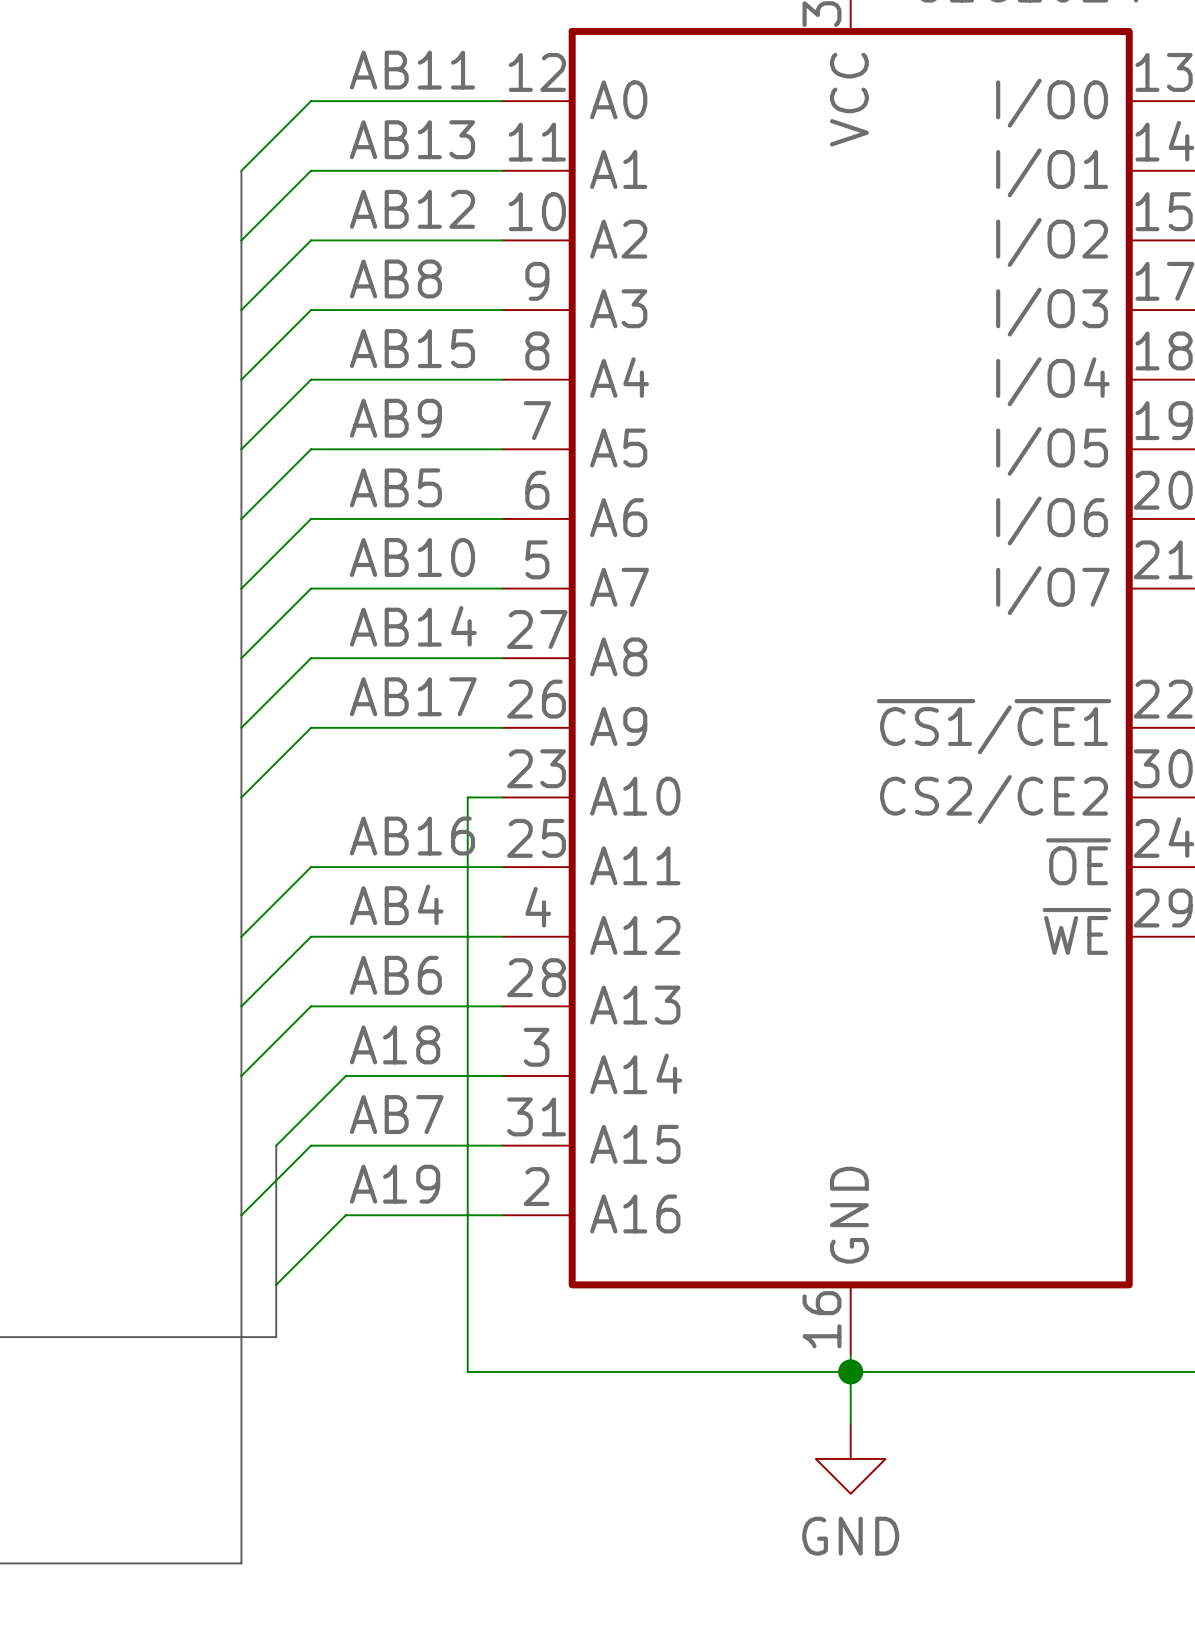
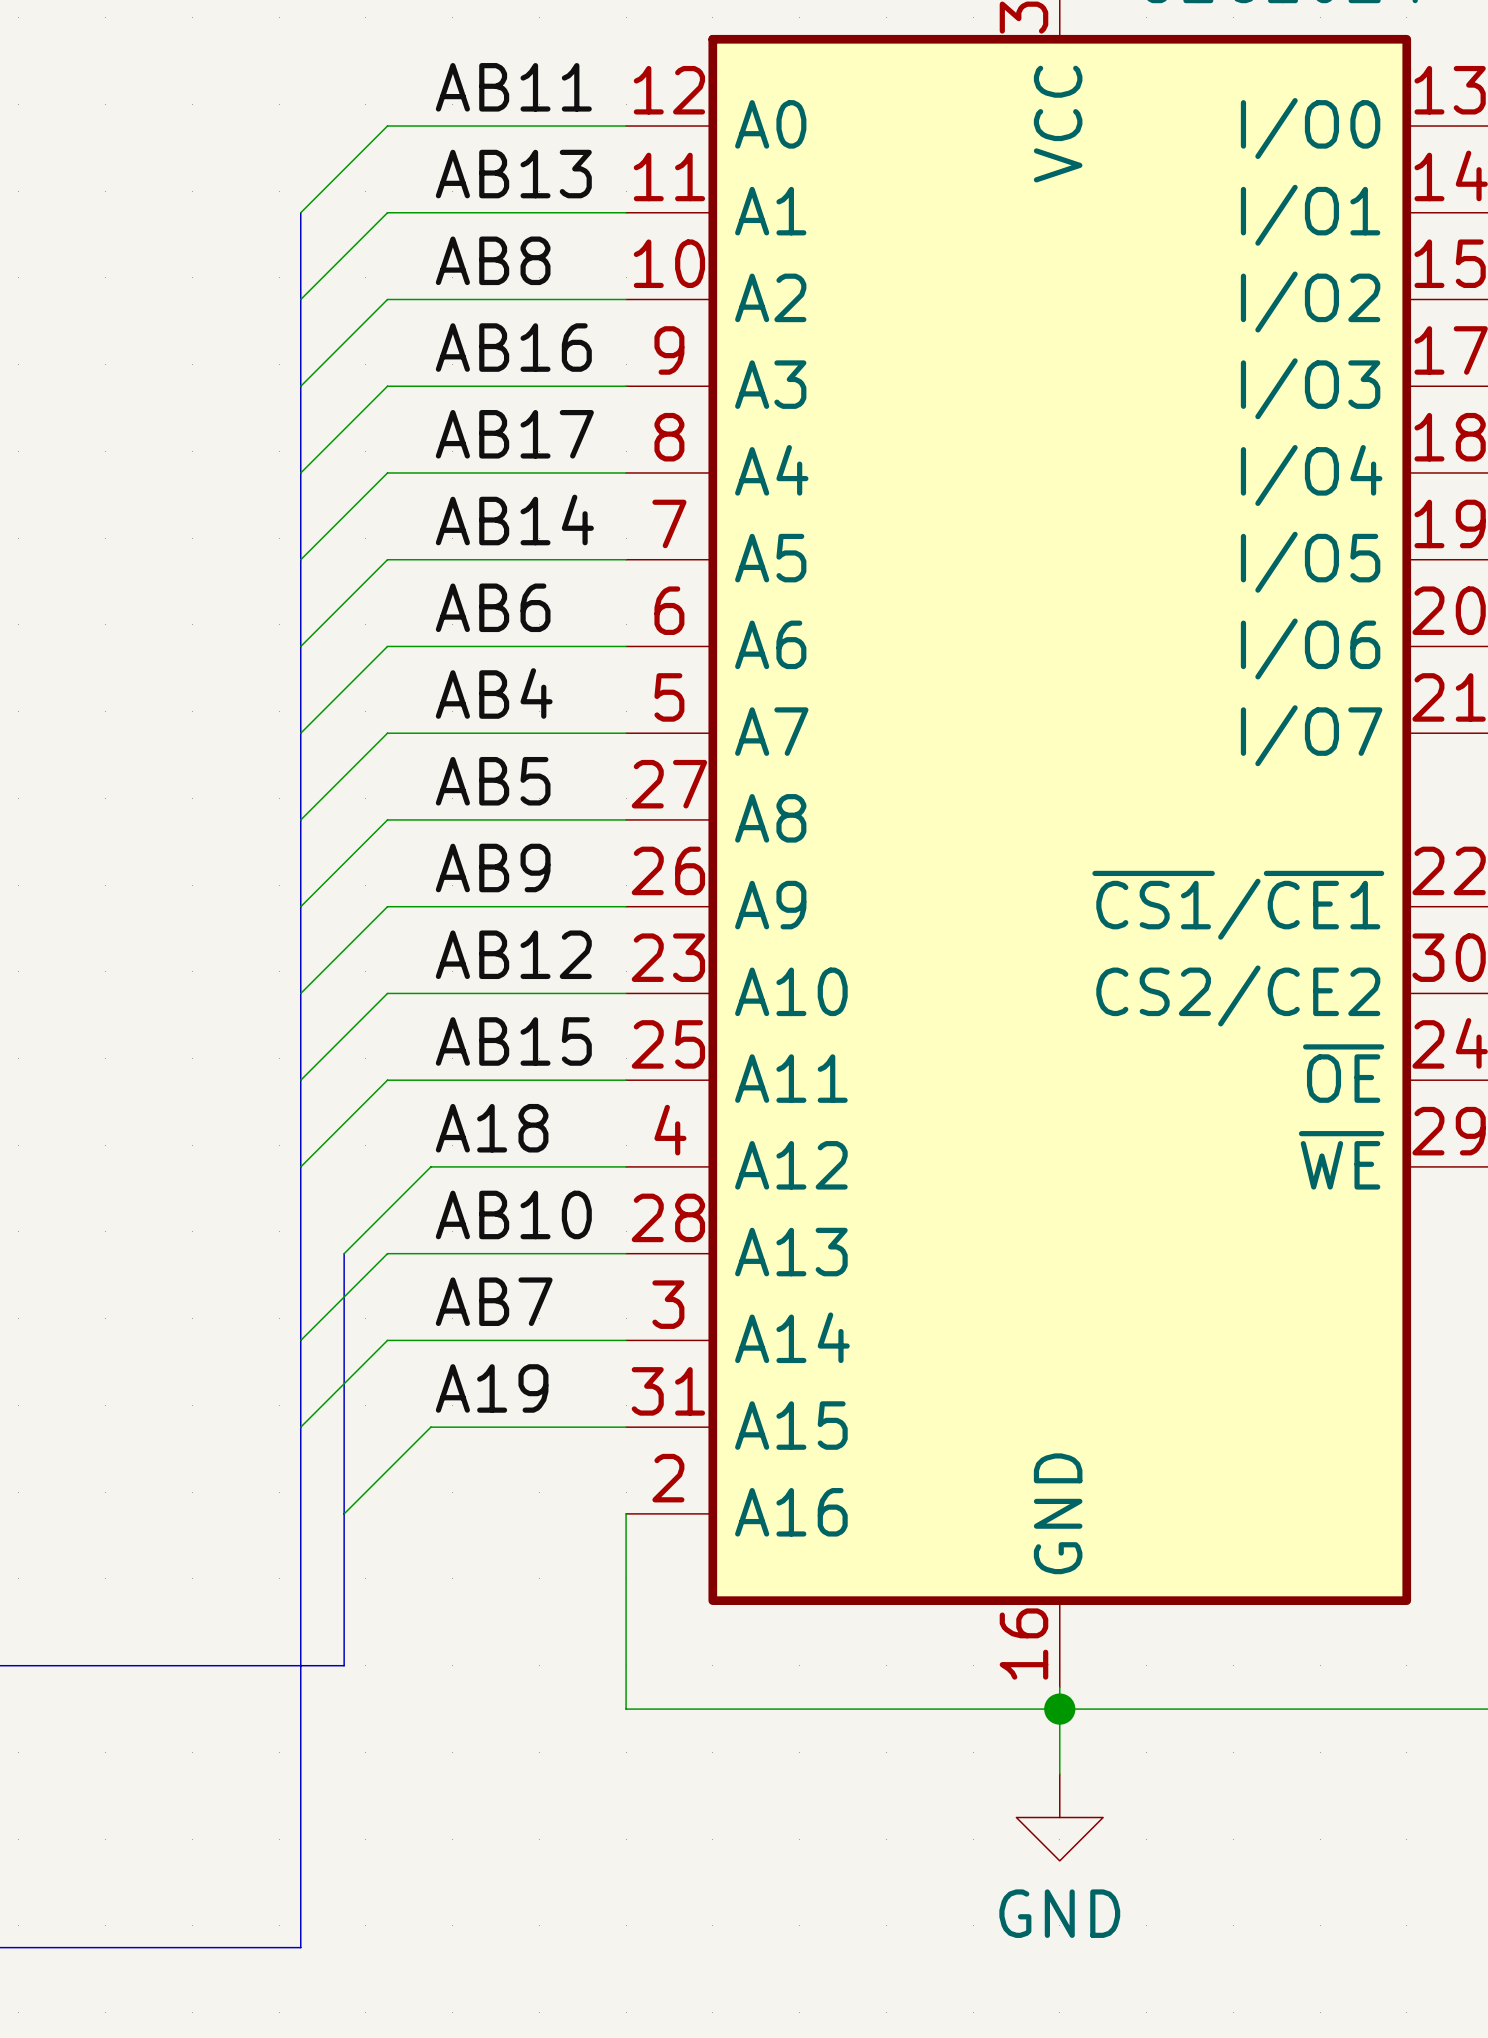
label: AB12 (412, 209) -> AB8 (493, 260)
label: AB8 (395, 278) -> AB16 (513, 347)
label: AB15 (412, 348) -> AB17 (514, 434)
label: AB9 (395, 418) -> AB14 (514, 519)
label: AB5 (395, 487) -> AB6 (493, 607)
label: AB10 (412, 557) -> AB4 (494, 693)
label: AB14 (413, 626) -> AB5 (493, 781)
label: AB17 (413, 696) -> AB9 (493, 868)
label: none -> AB12 (513, 954)
wire: (467, 797) (467, 1371) (502, 1371) -> (582, 993) (387, 993)
label: AB16 (412, 836) -> AB15 (513, 1041)
label: AB4 (396, 904) -> A18 (492, 1128)
wire: (311, 936) (345, 936) -> (344, 1253) (430, 1166)
wire: (311, 936) (241, 1006) -> (387, 993) (300, 1080)
label: AB6 (395, 975) -> AB10 (513, 1214)
bus: none -> (344, 1253) (344, 1427)
label: A18 (395, 1044) -> AB7 (494, 1301)
wire: (345, 1076) (276, 1145) -> (430, 1340) (387, 1340) (300, 1427)
label: AB7 (396, 1114) -> A19 (492, 1388)
wire: (345, 1145) (311, 1145) (241, 1215) -> (430, 1427) (344, 1513)
label: A19 (395, 1184) -> none
wire: (502, 1215) (345, 1215) (276, 1284) -> (626, 1513) (626, 1709)

